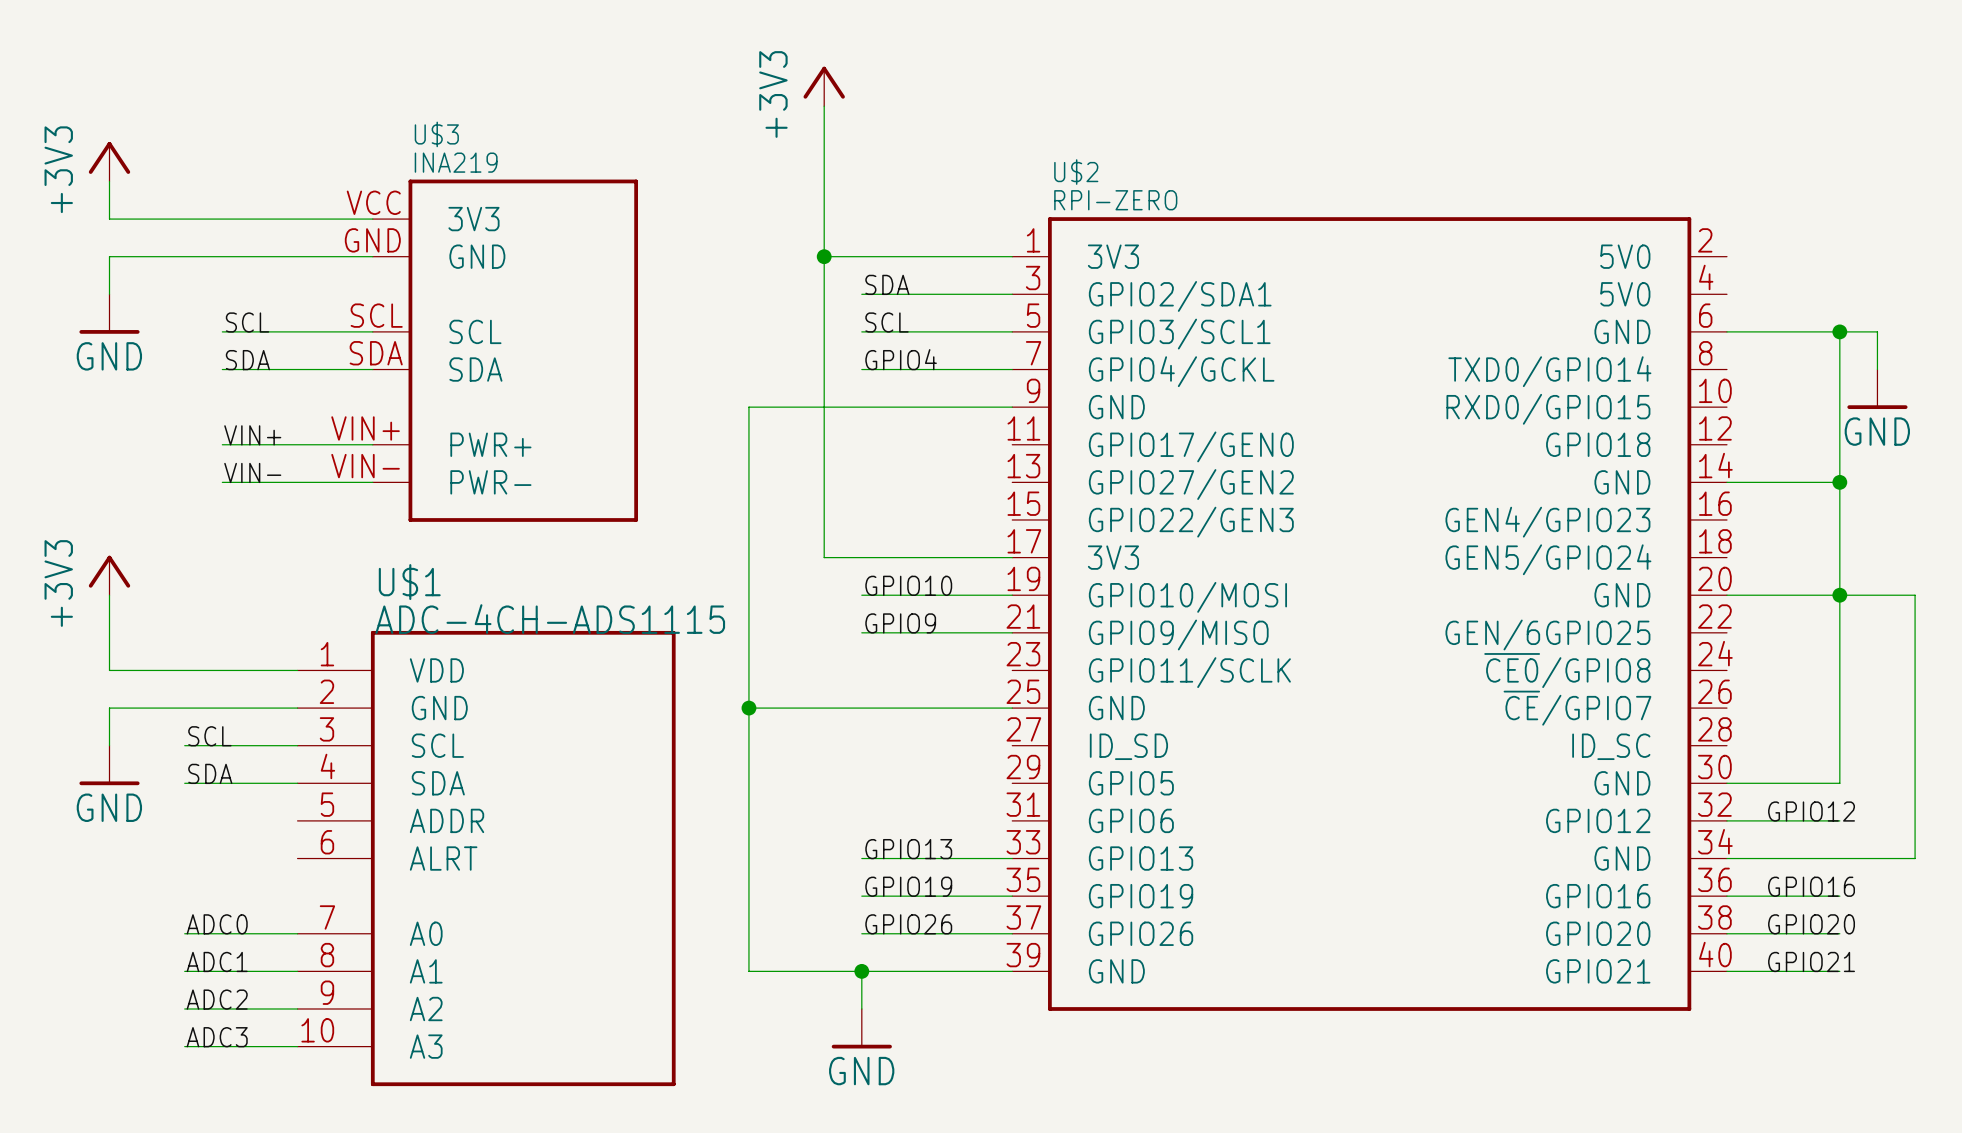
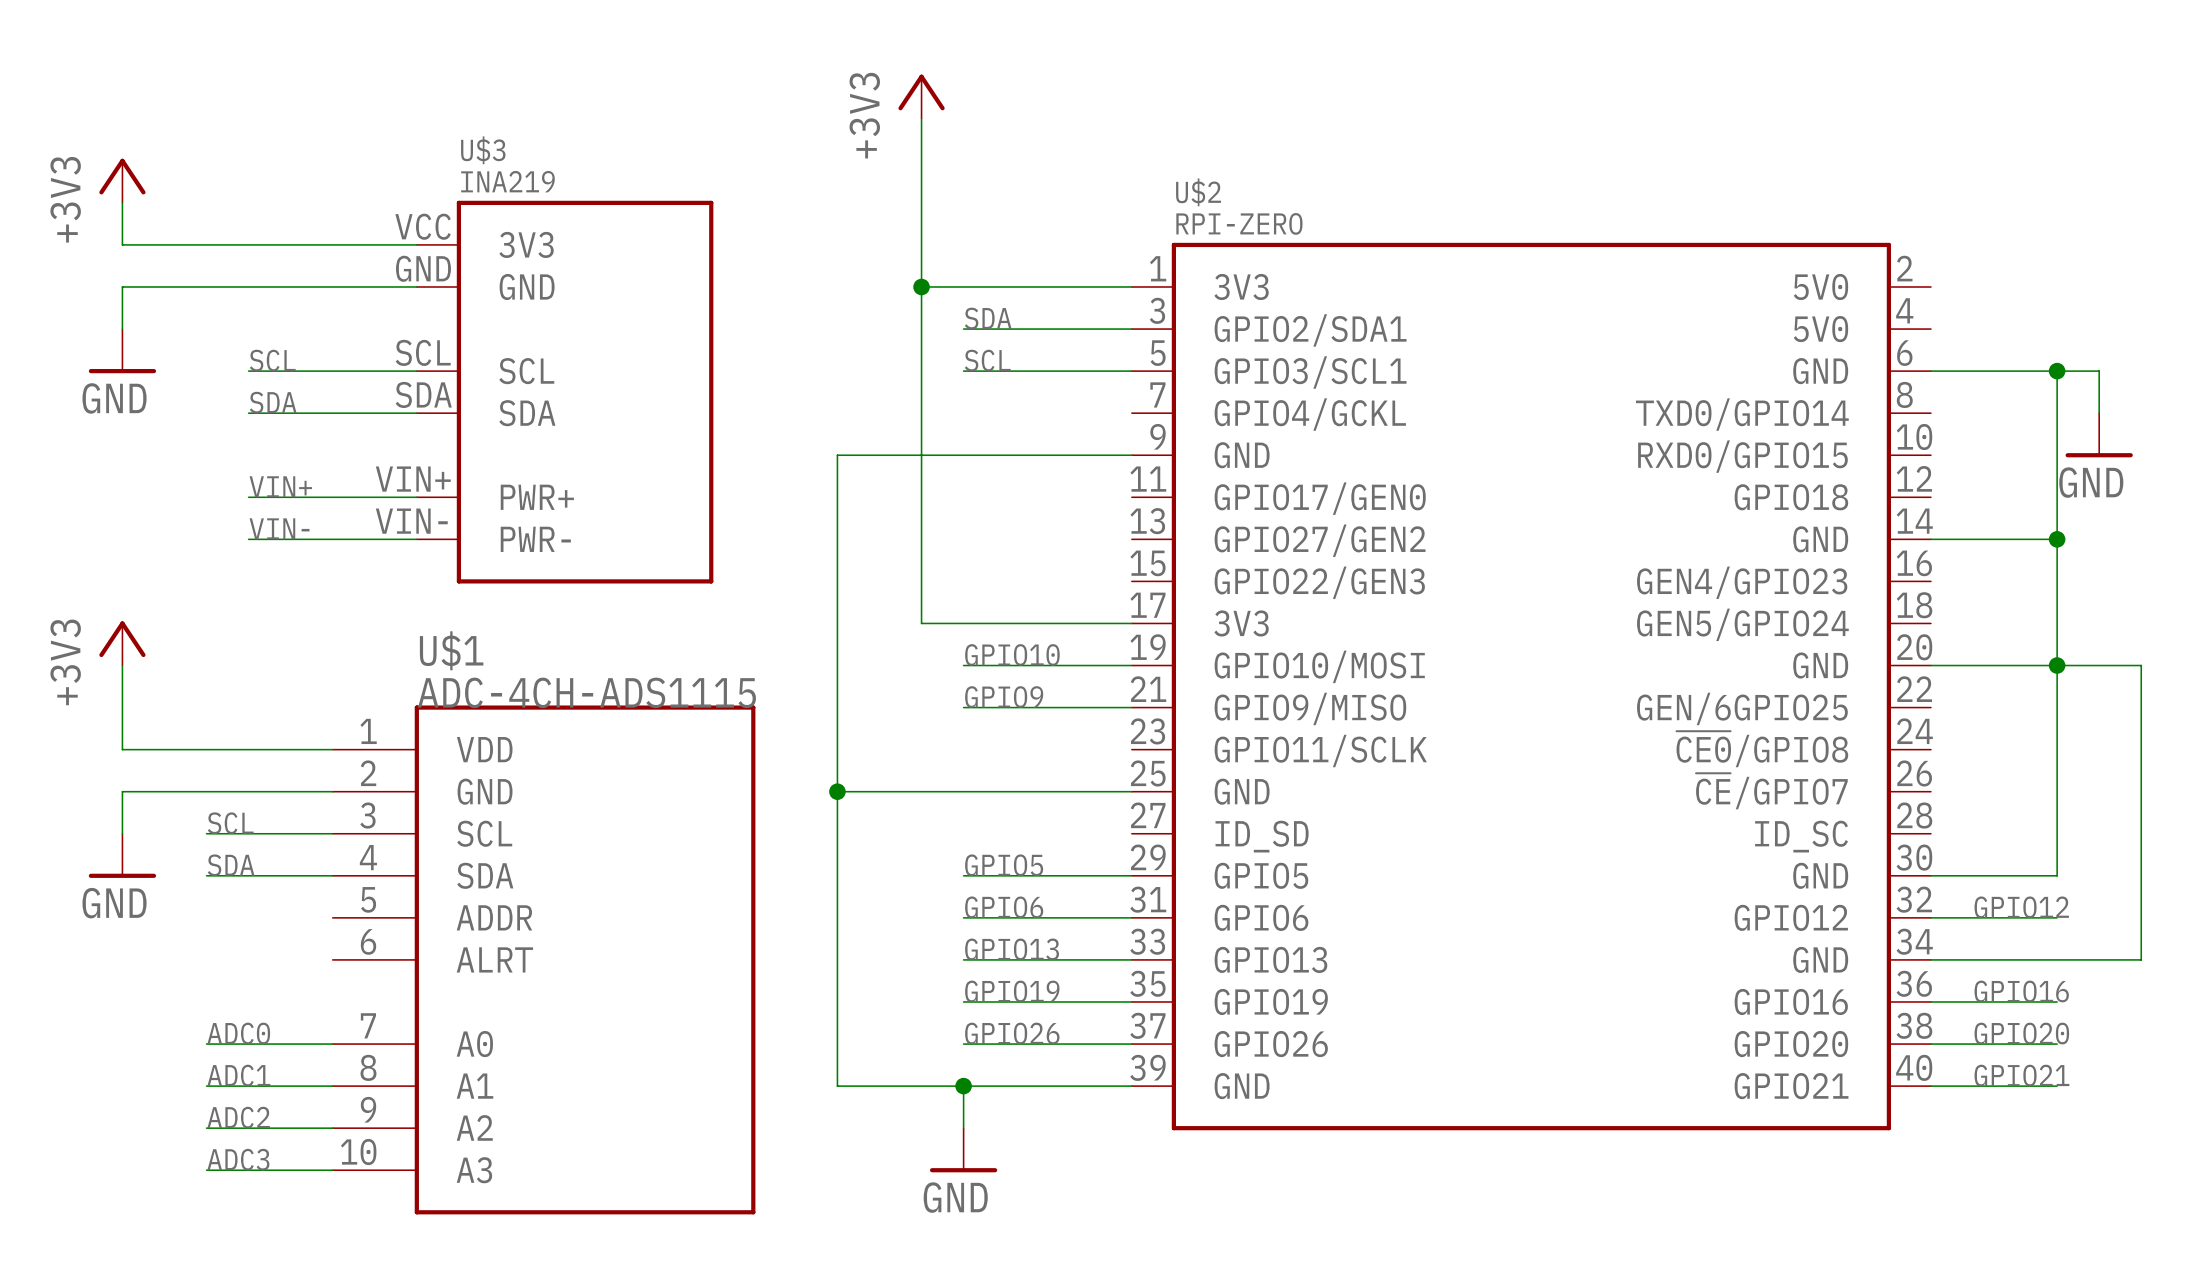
label: GPIO4 (901, 359) -> none
wire: (861, 369) (1012, 369) -> none
label: none -> GPIO5 (1004, 865)
wire: none -> (963, 875) (1131, 875)
label: none -> GPIO6 (1004, 907)
wire: none -> (963, 917) (1131, 917)

